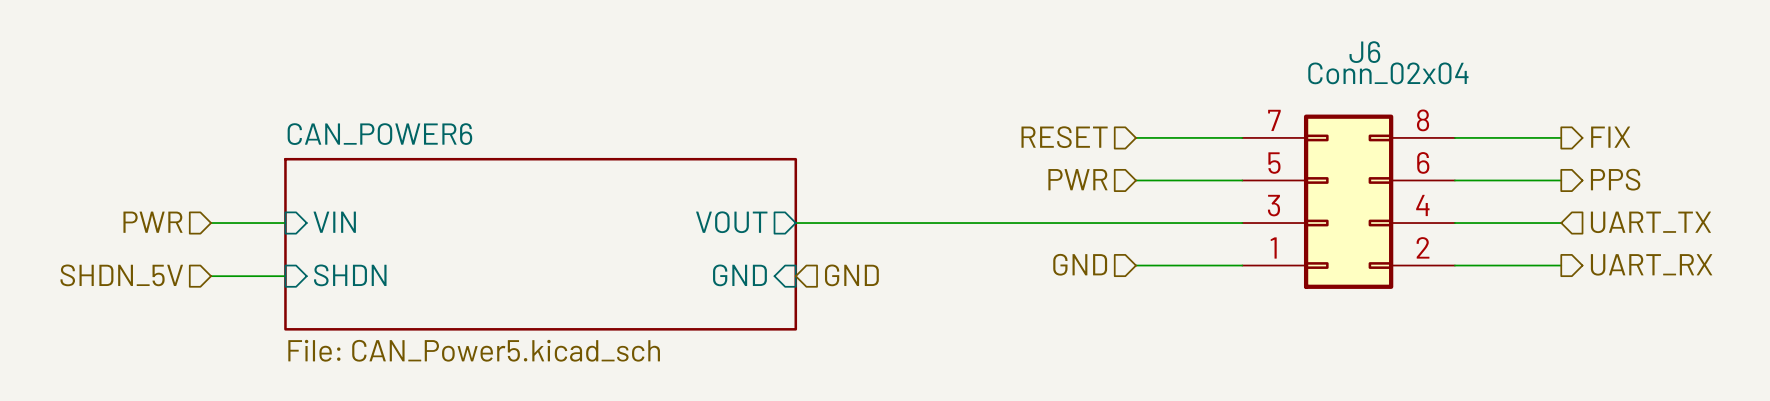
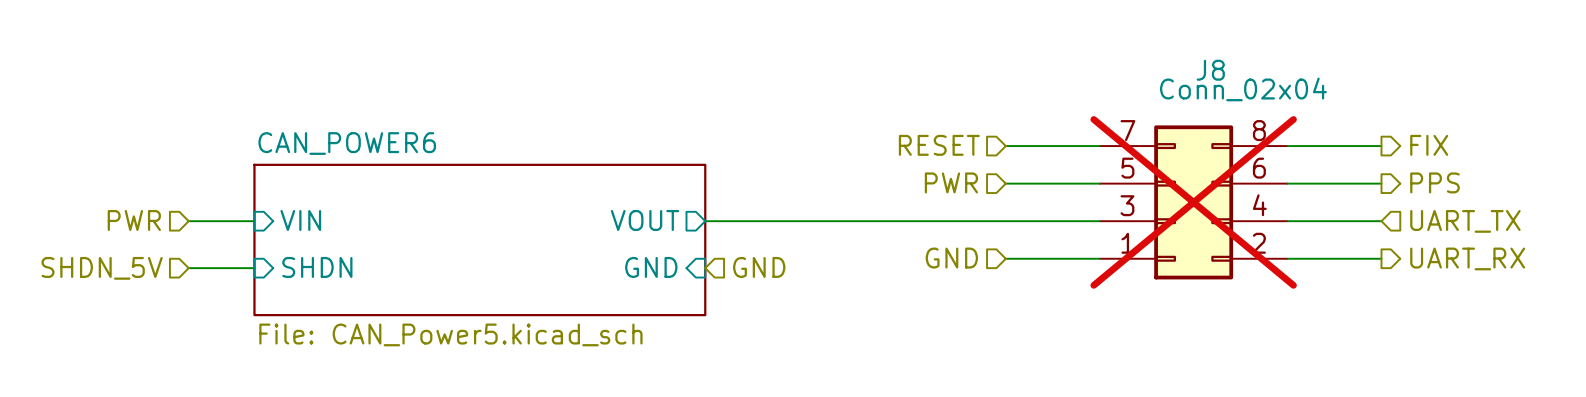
J6 name: J6 (1364, 52) -> J8 (1210, 70)
J6 do-not-place cross: none -> (1193, 202)

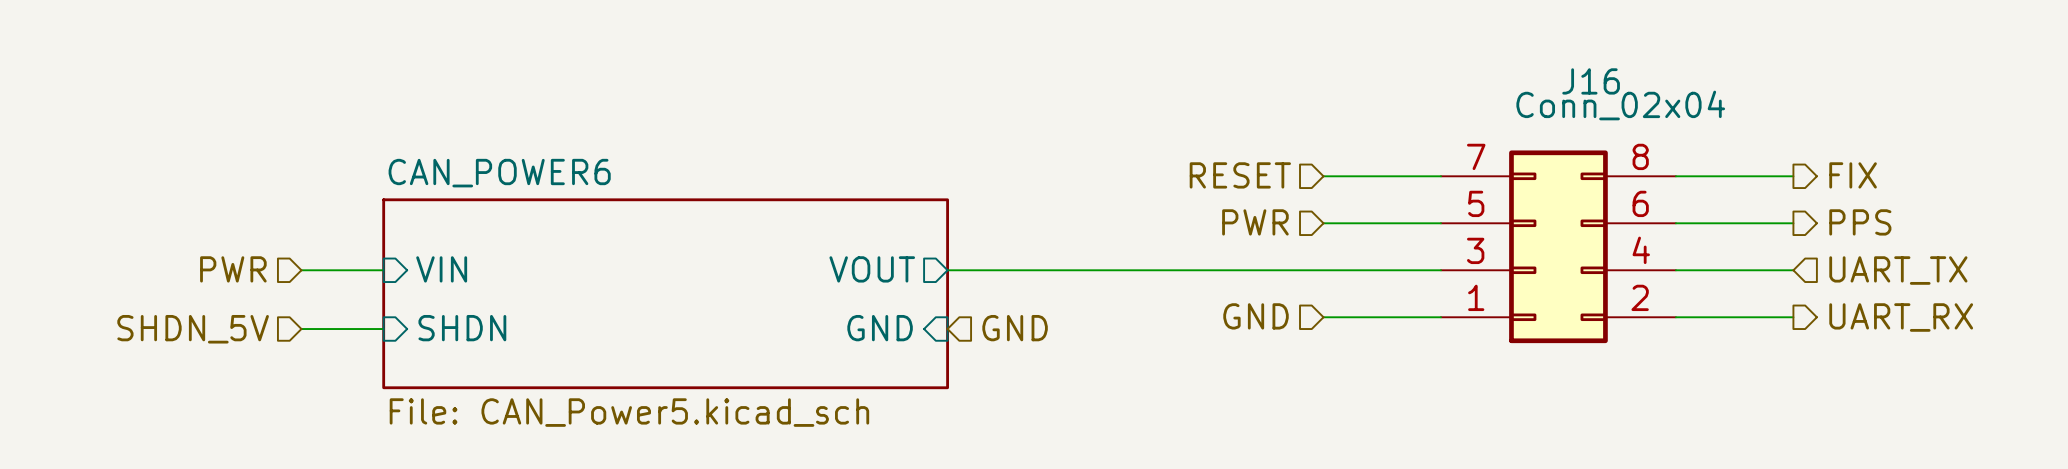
J8 name: J8 (1210, 70) -> J16 (1591, 81)
J8 do-not-place cross: (1193, 202) -> none

